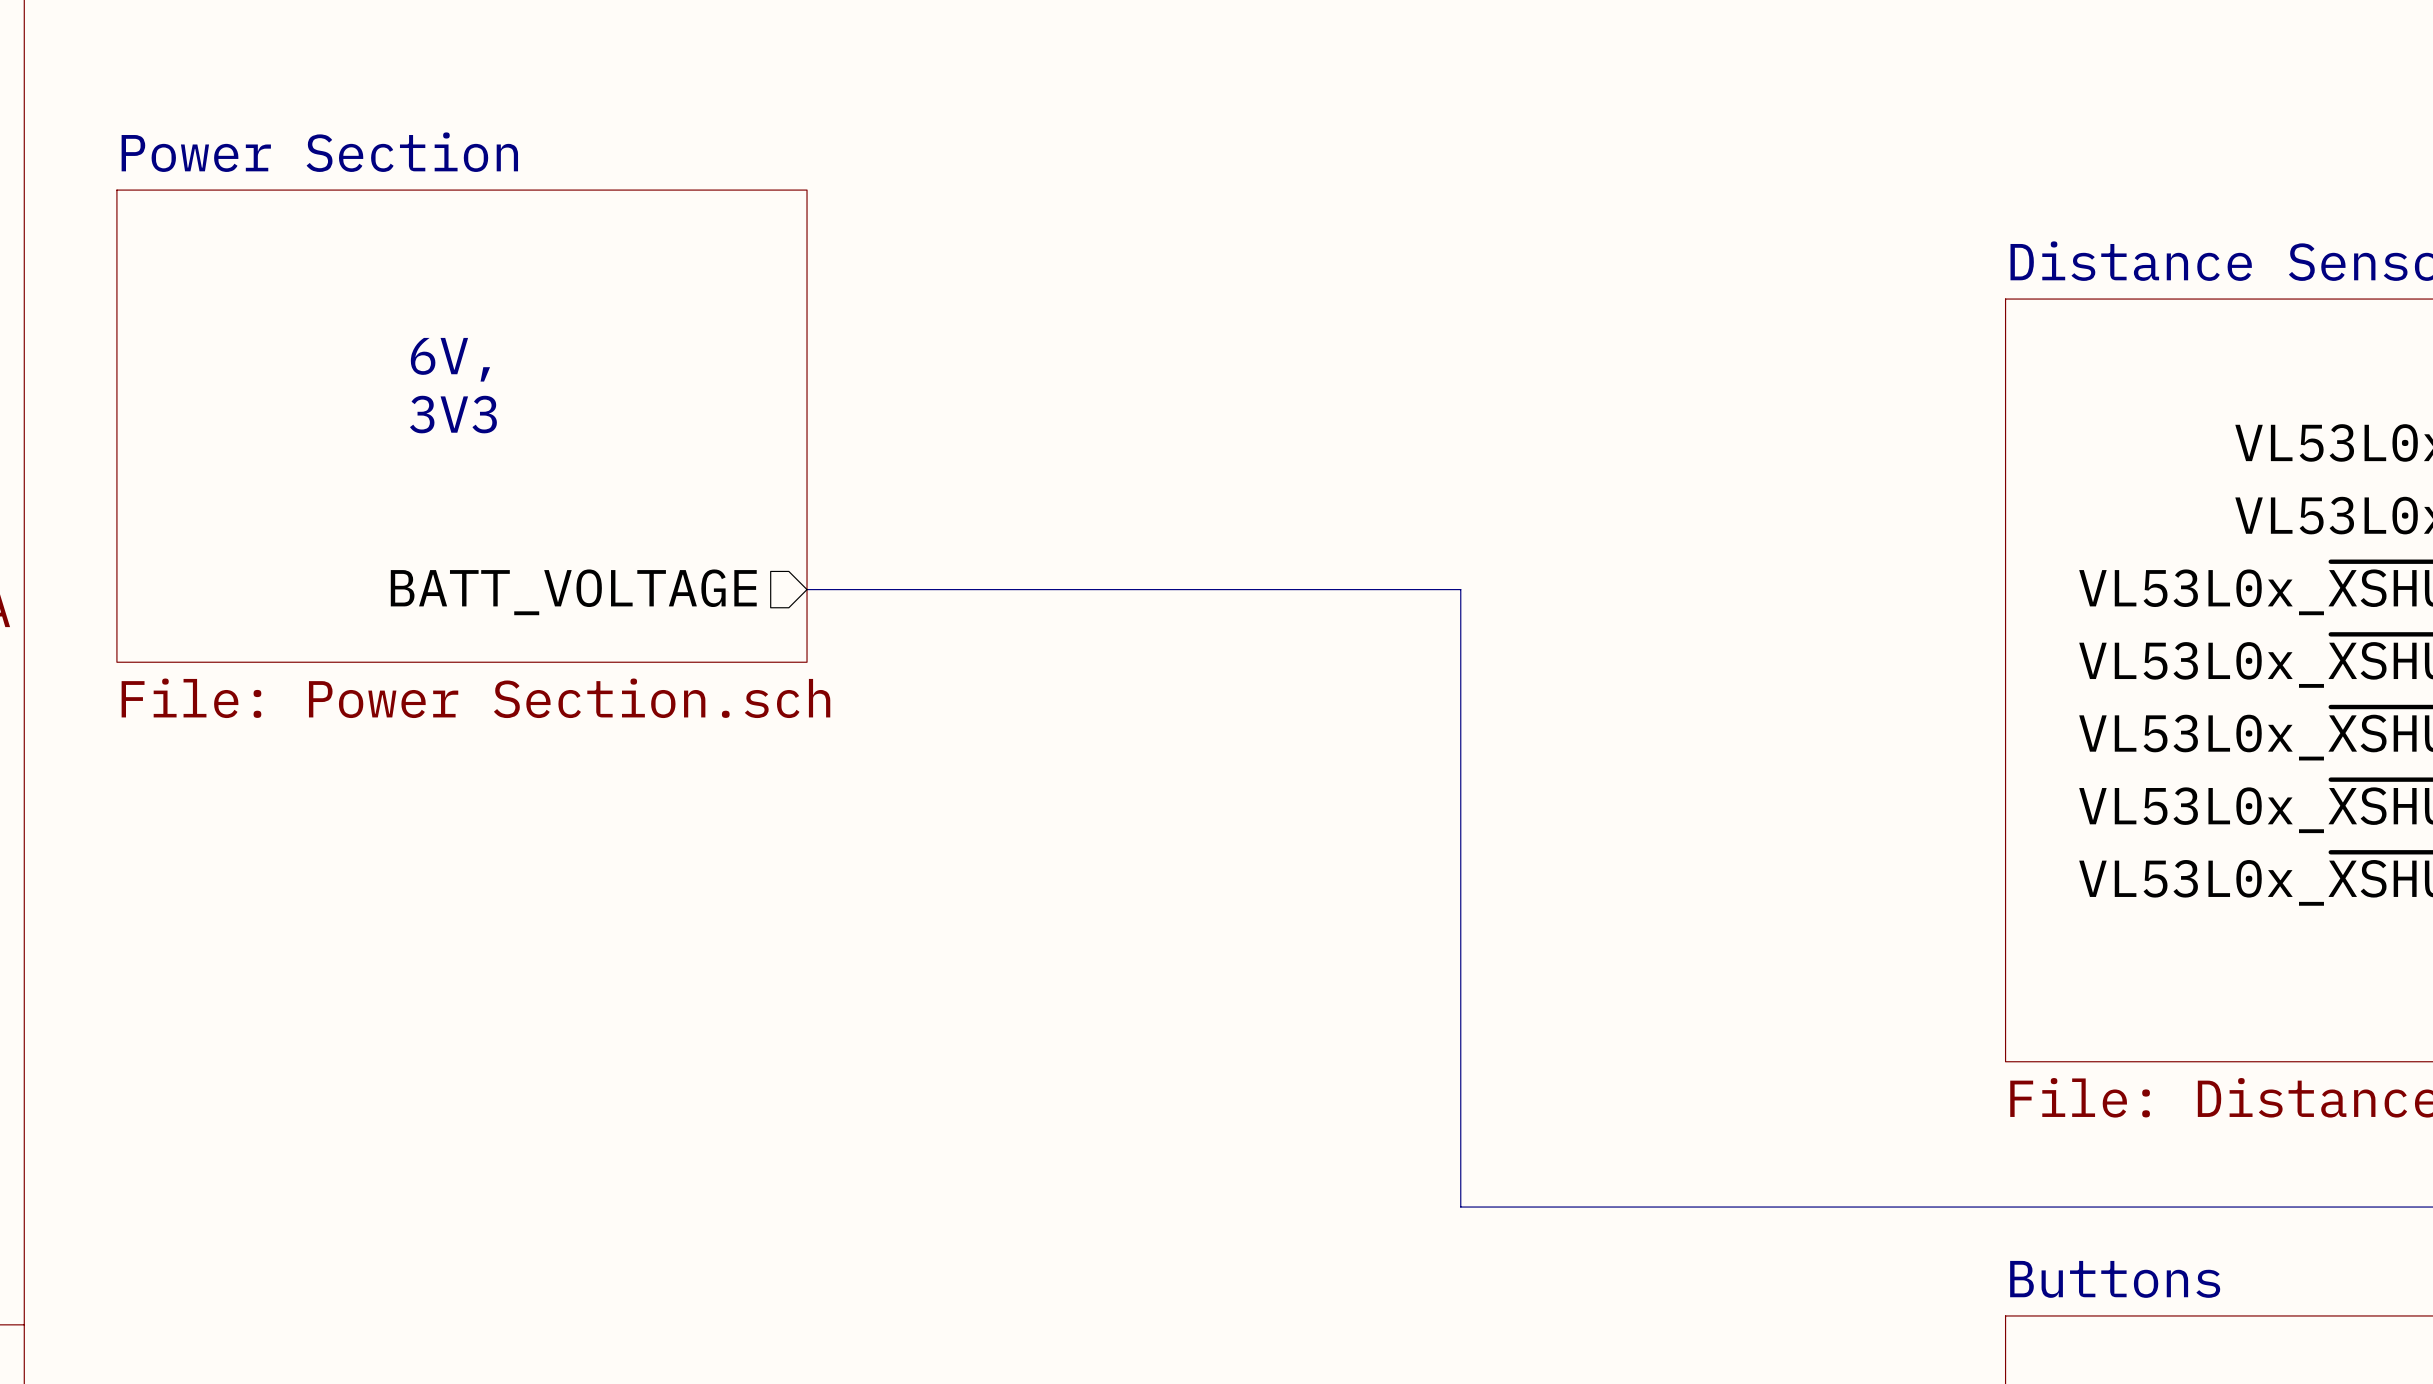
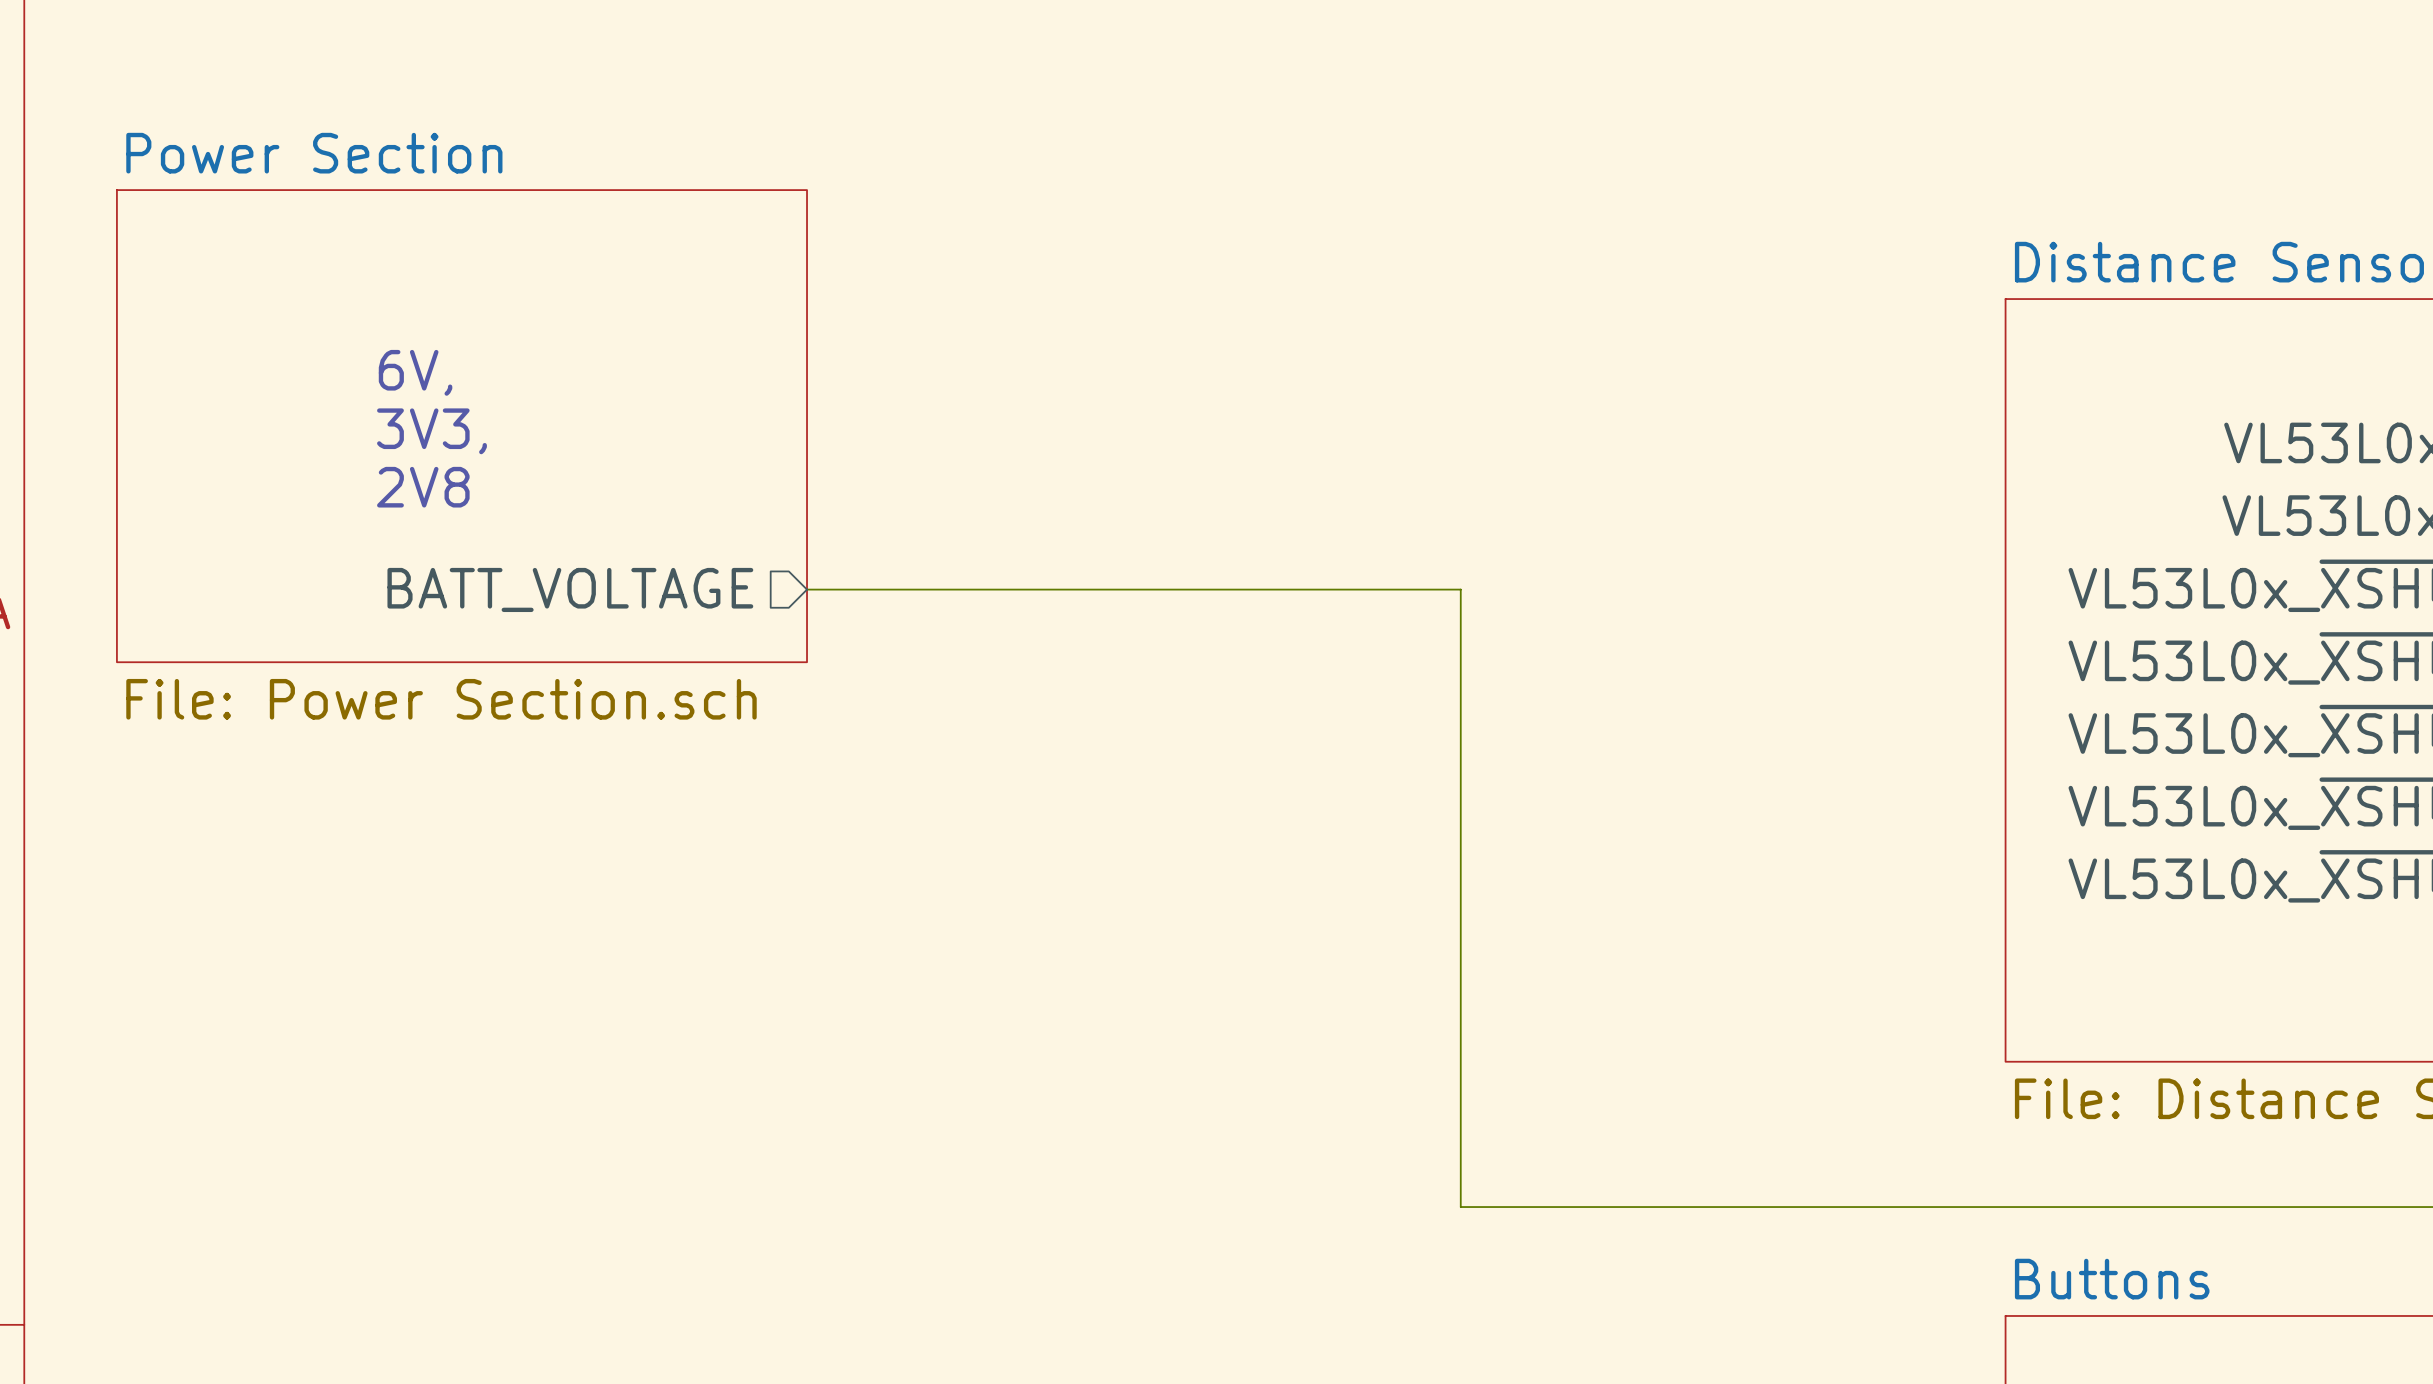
text position: 6V, (450, 359) -> 6V, (415, 372)
text: 3V3 (453, 414) -> 3V3, (431, 431)
text: none -> 2V8 (423, 487)

